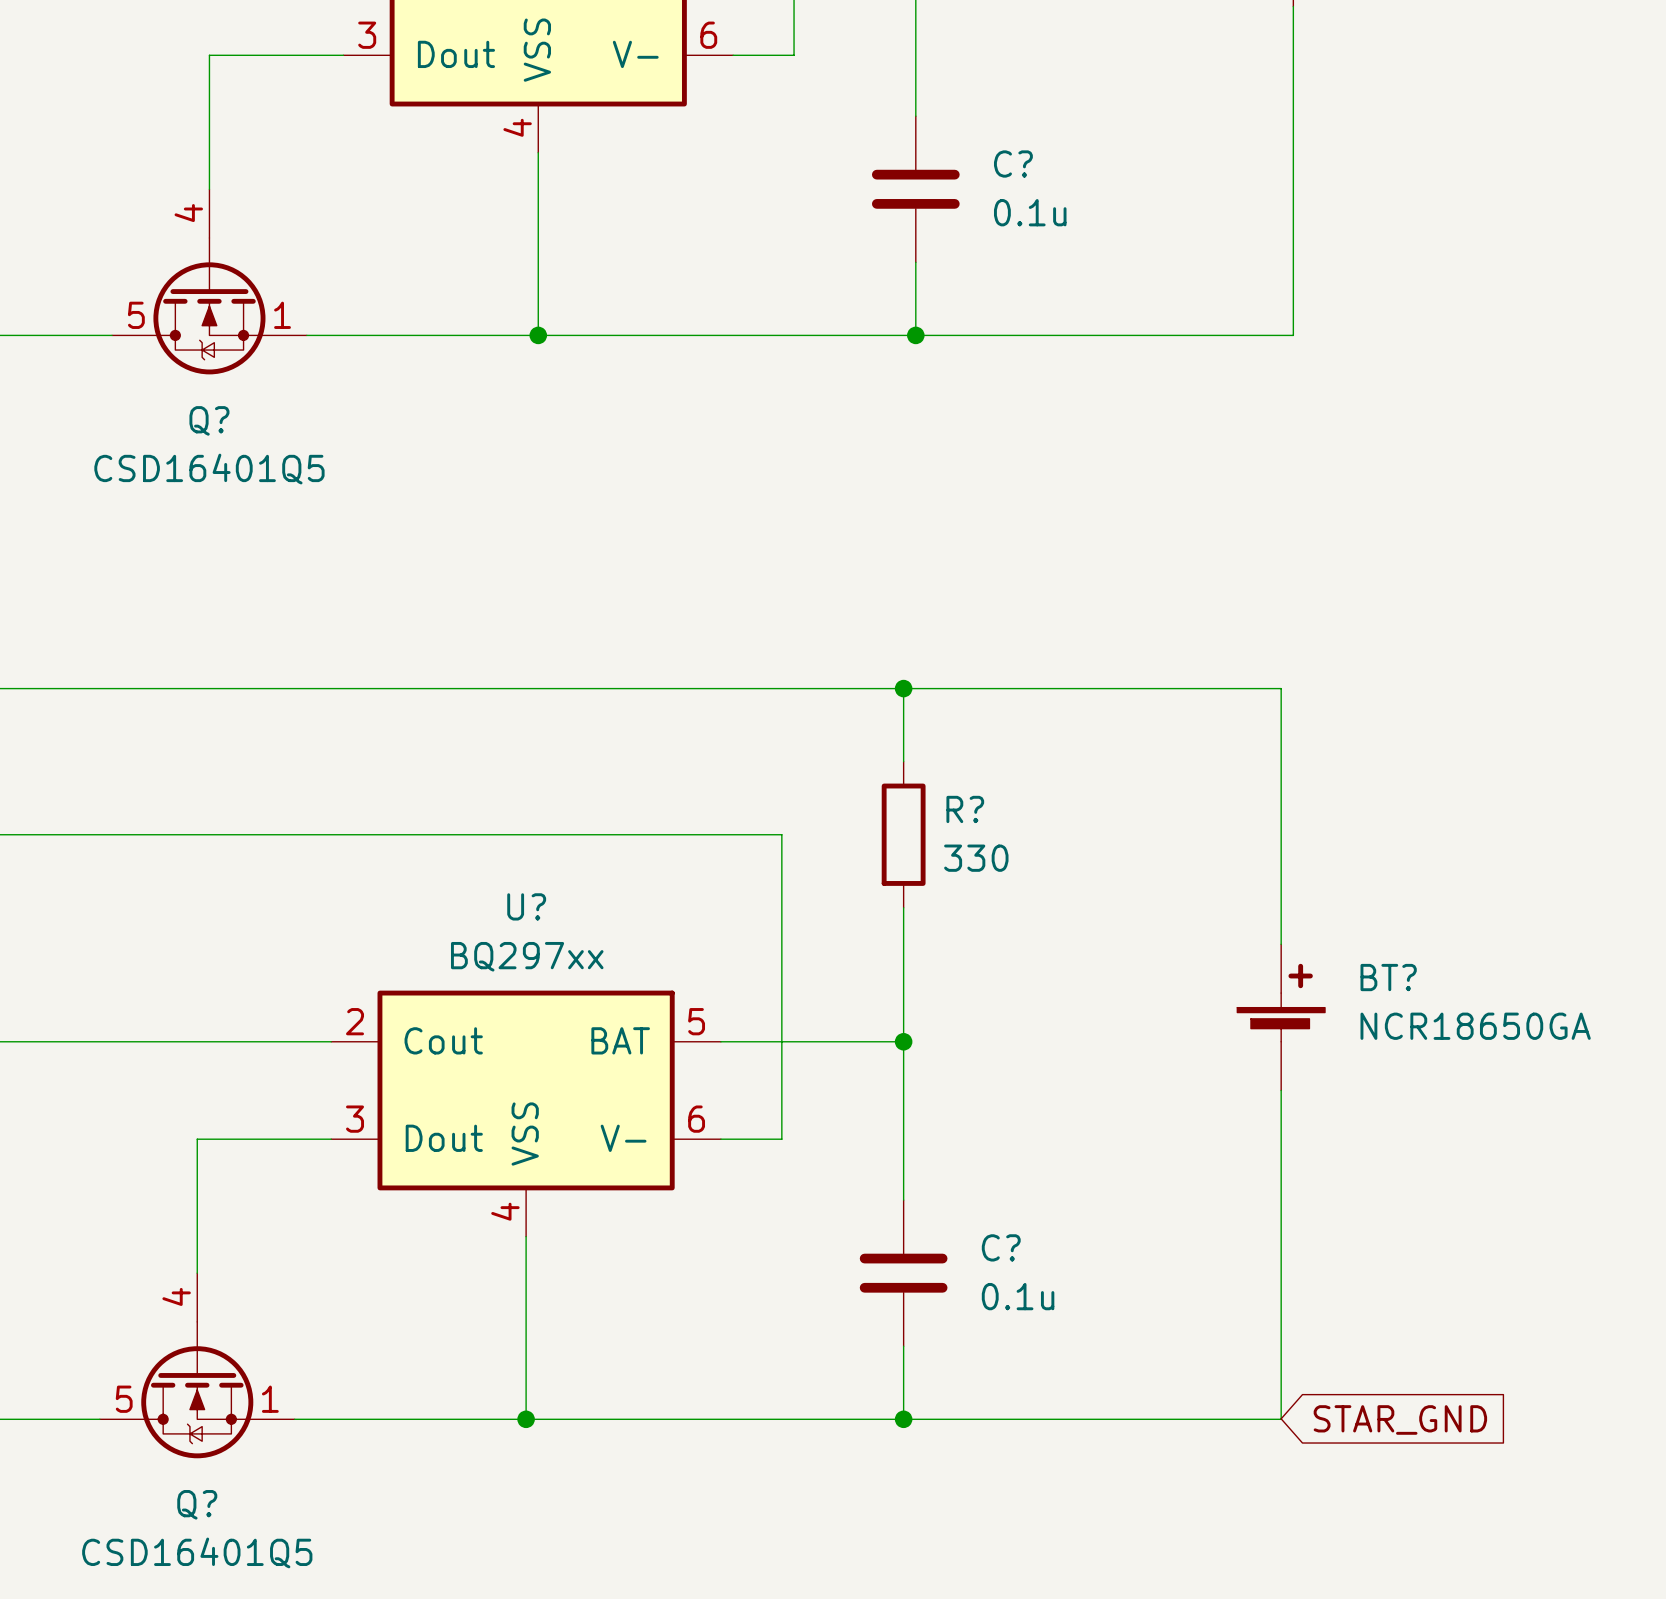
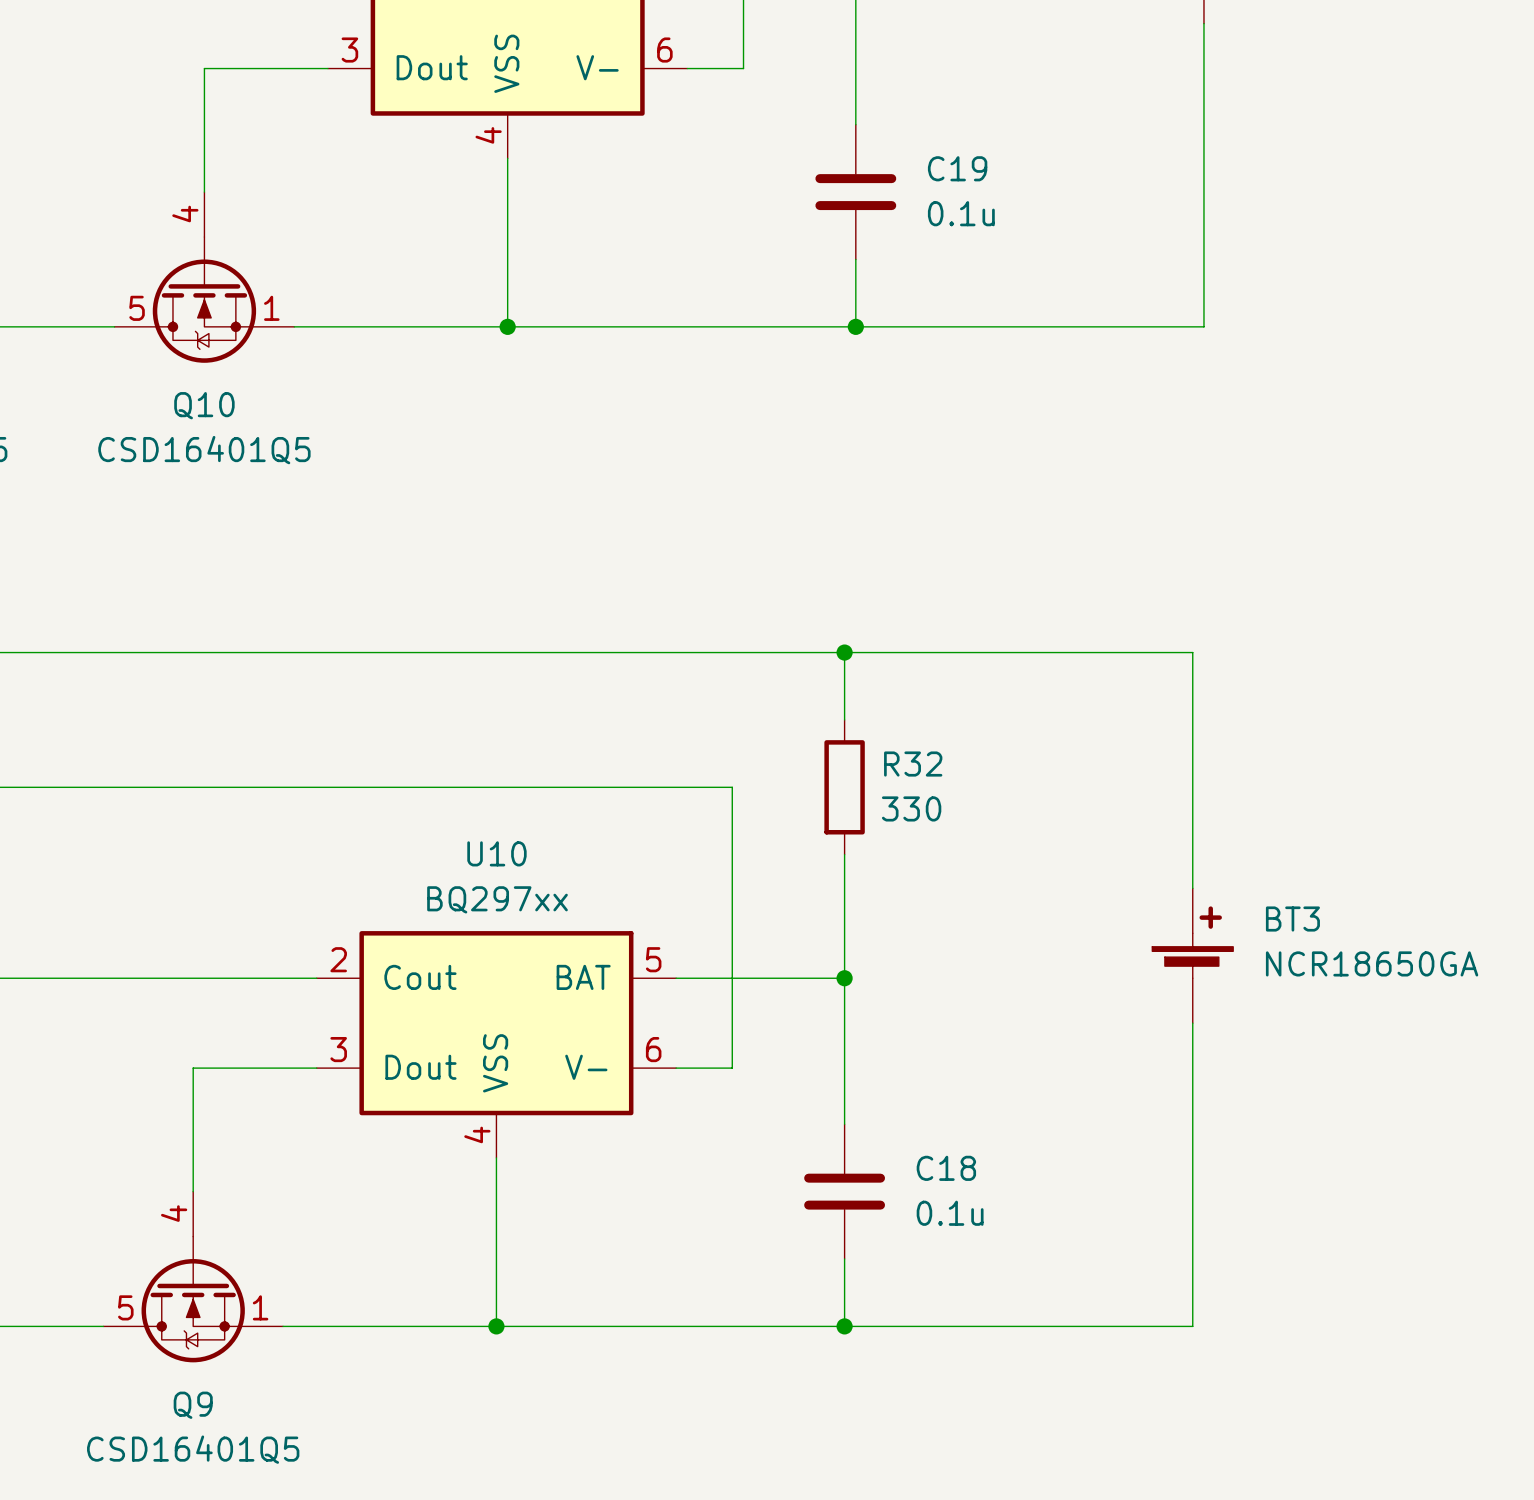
C? name: C? (1013, 164) -> C19 (957, 168)
Q? name: Q? (209, 420) -> Q10 (204, 405)
R? name: R? (965, 809) -> R32 (913, 764)
U? name: U? (526, 906) -> U10 (496, 853)
BT? name: BT? (1388, 977) -> BT3 (1292, 919)
C? name: C? (1001, 1247) -> C18 (946, 1168)
global label: STAR_GND (1400, 1419) -> none
Q? name: Q? (197, 1504) -> Q9 (193, 1405)

